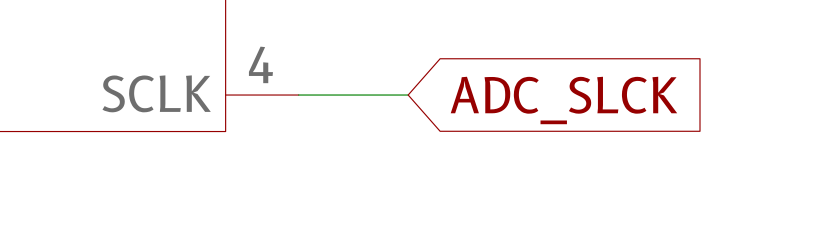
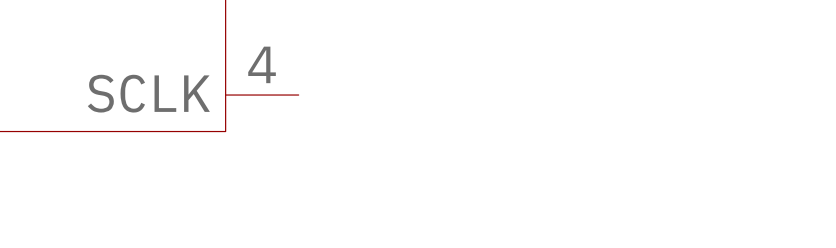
wire: (298, 95) (408, 95) -> none
global label: ADC_SLCK (563, 100) -> none

